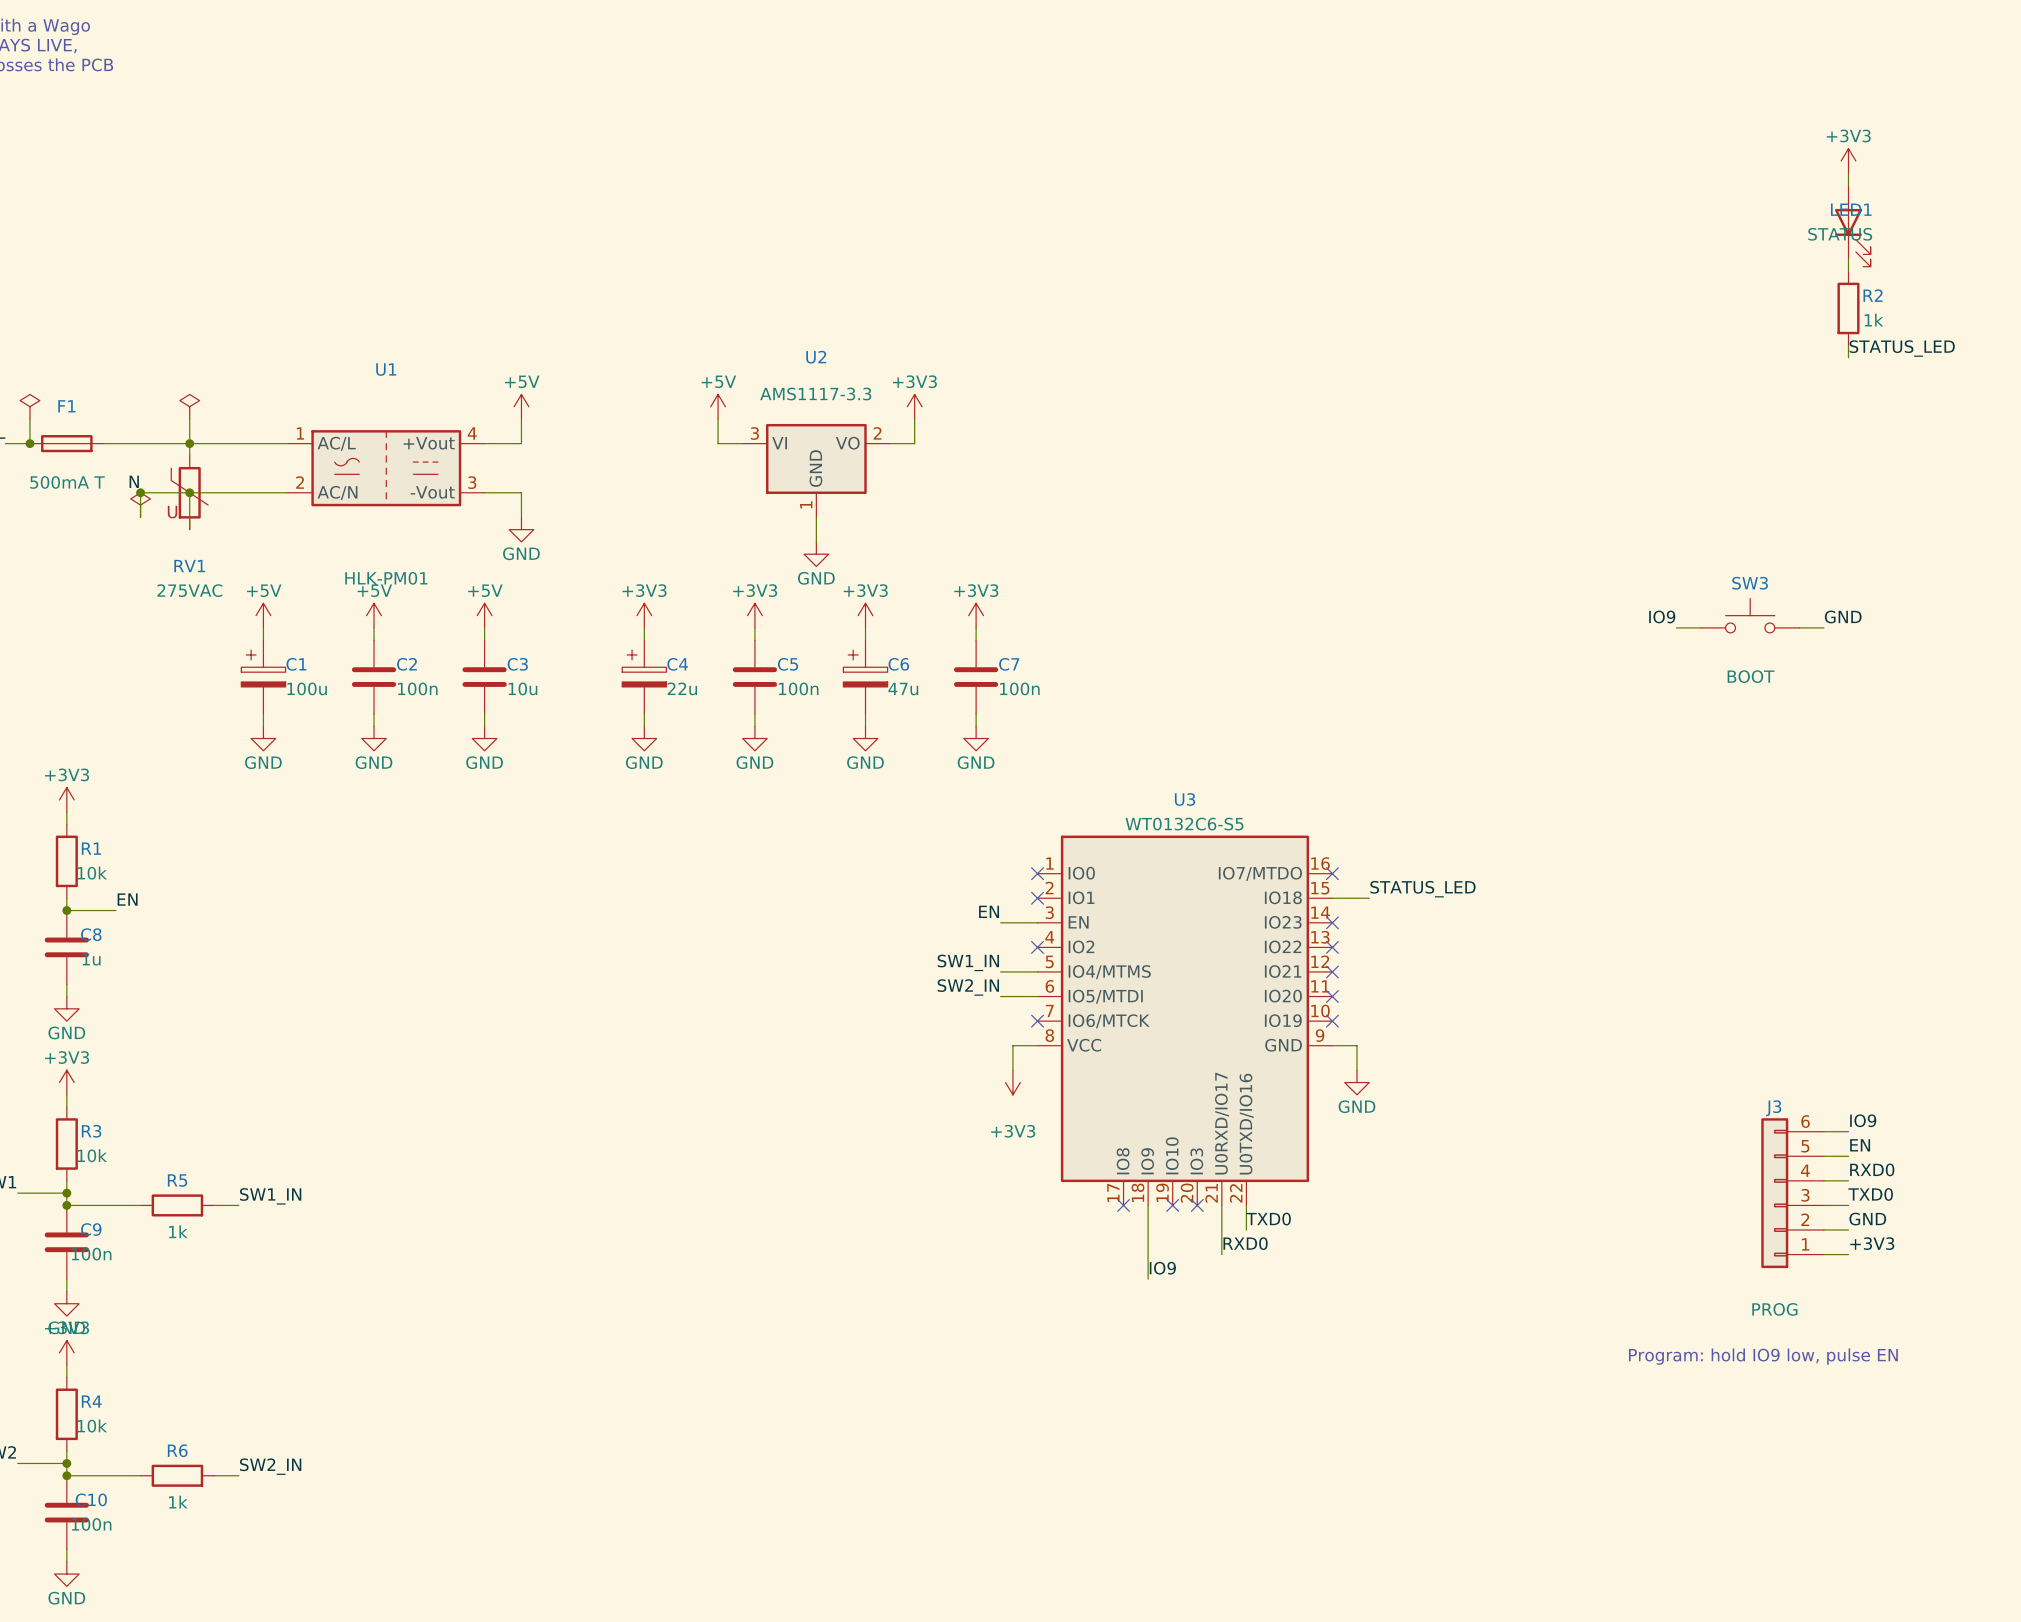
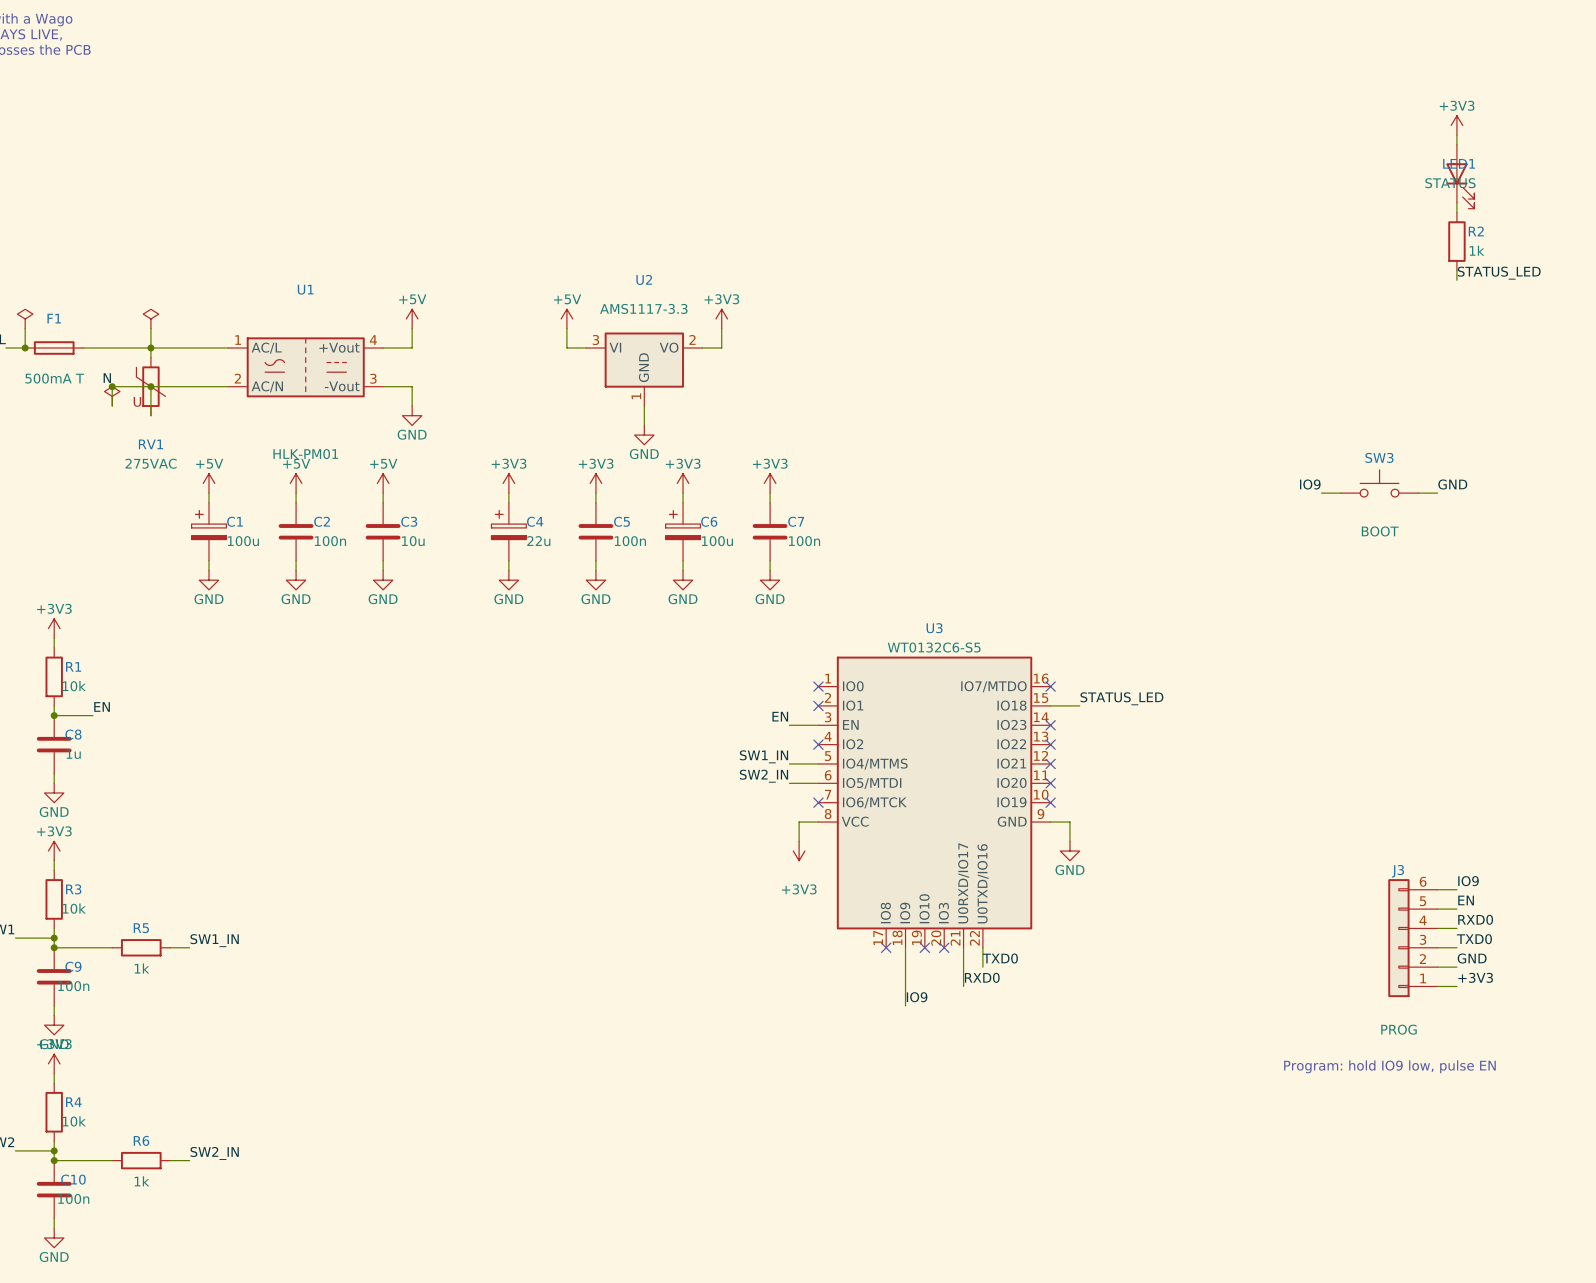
C6 value: 47u (903, 689) -> 100u (717, 541)

